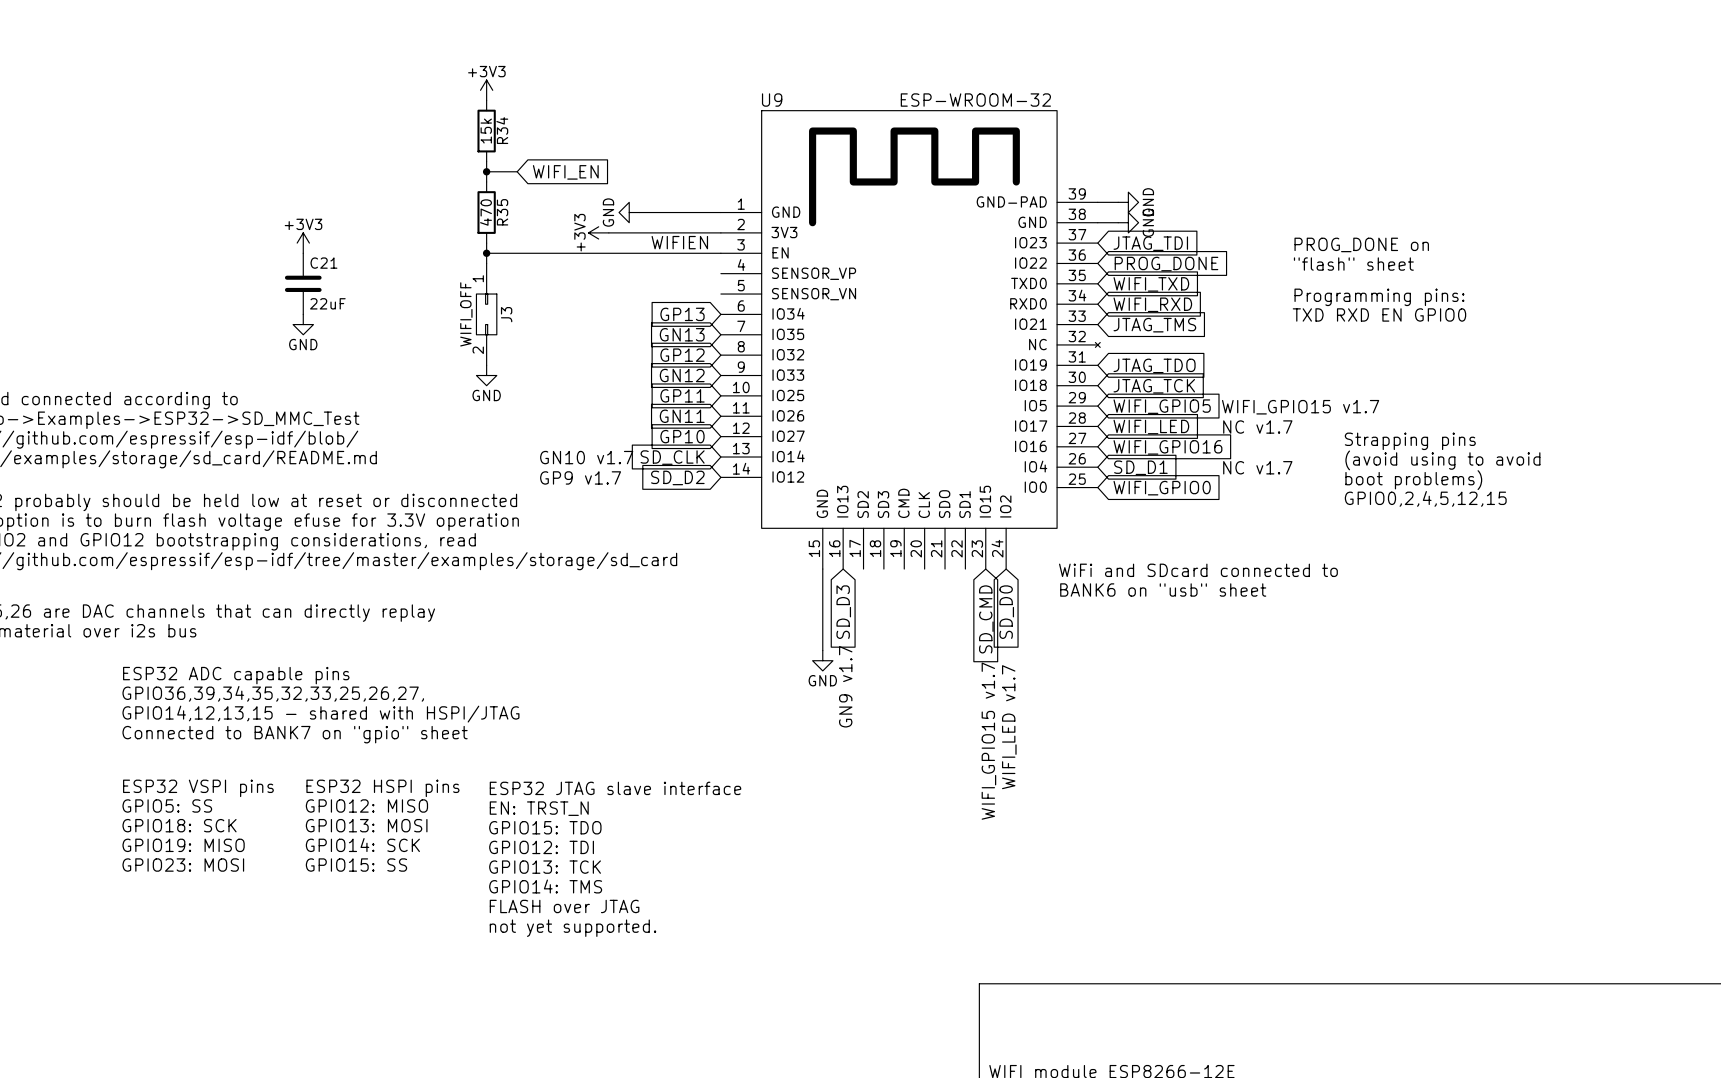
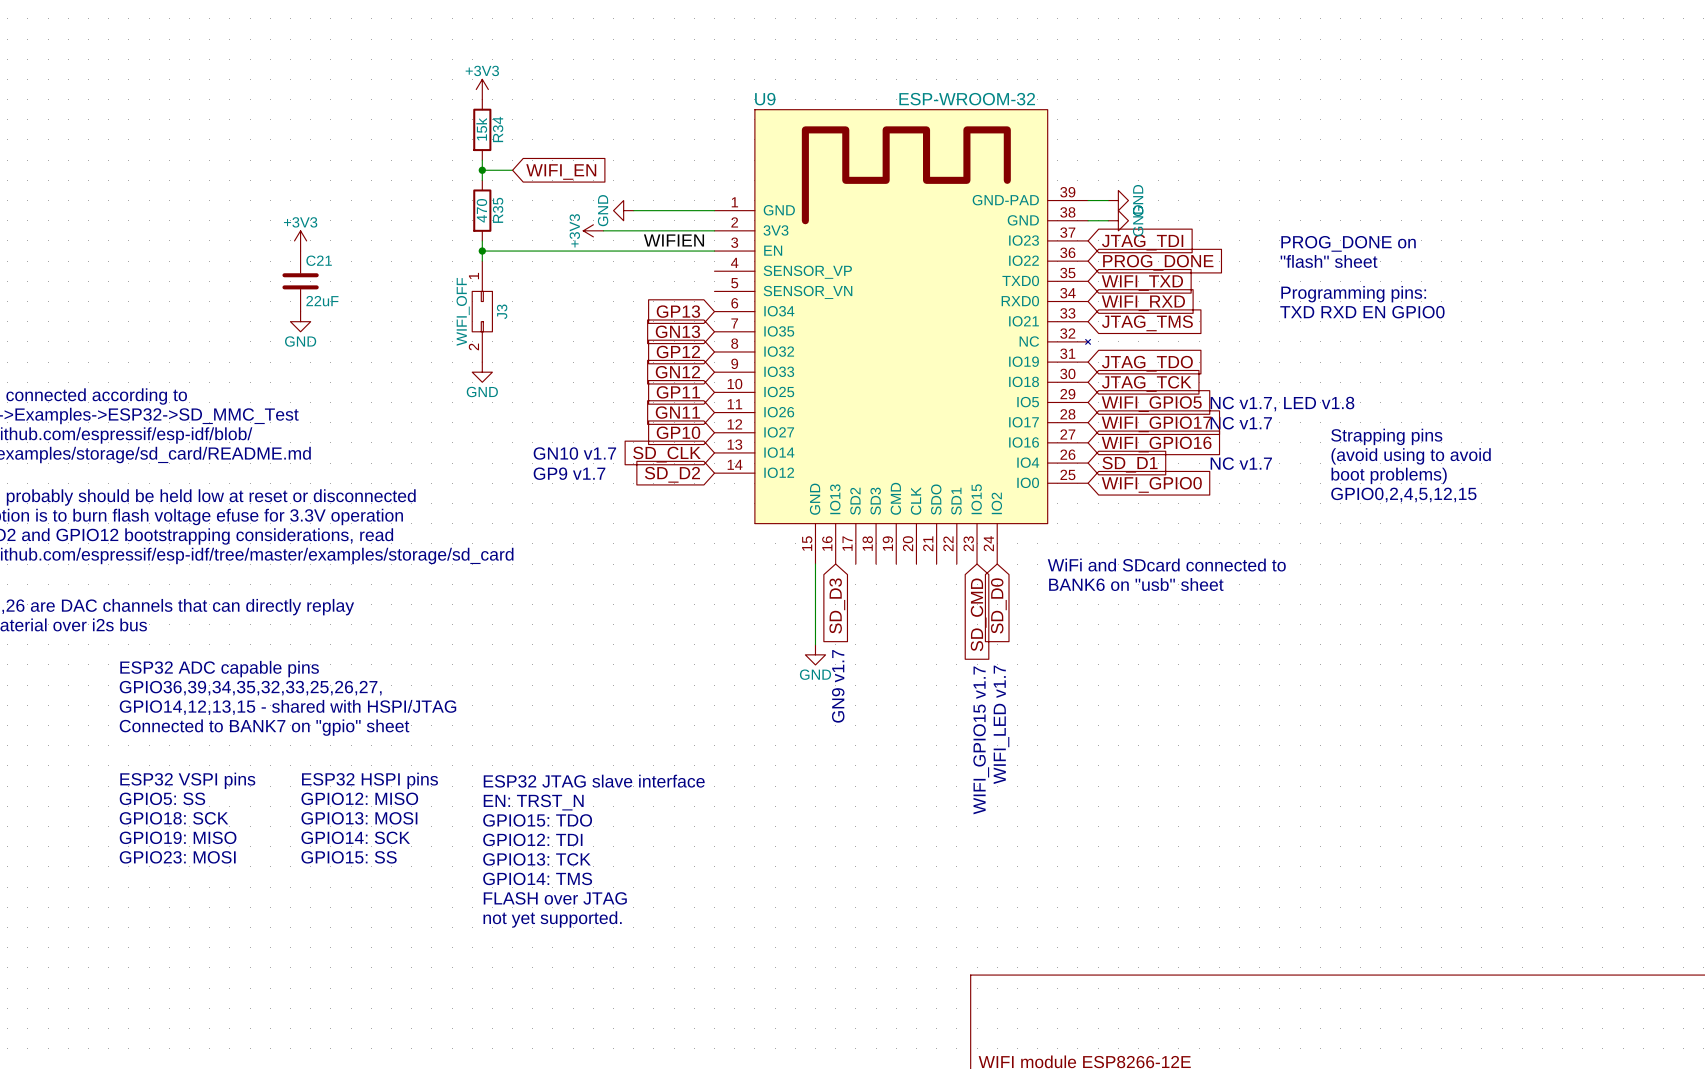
text: WIFI_GPIO15 v1.7 (1300, 407) -> NC v1.7, LED v1.8 (1282, 404)
global label: WIFI_LED (1151, 427) -> WIFI_GPIO17 (1156, 424)

